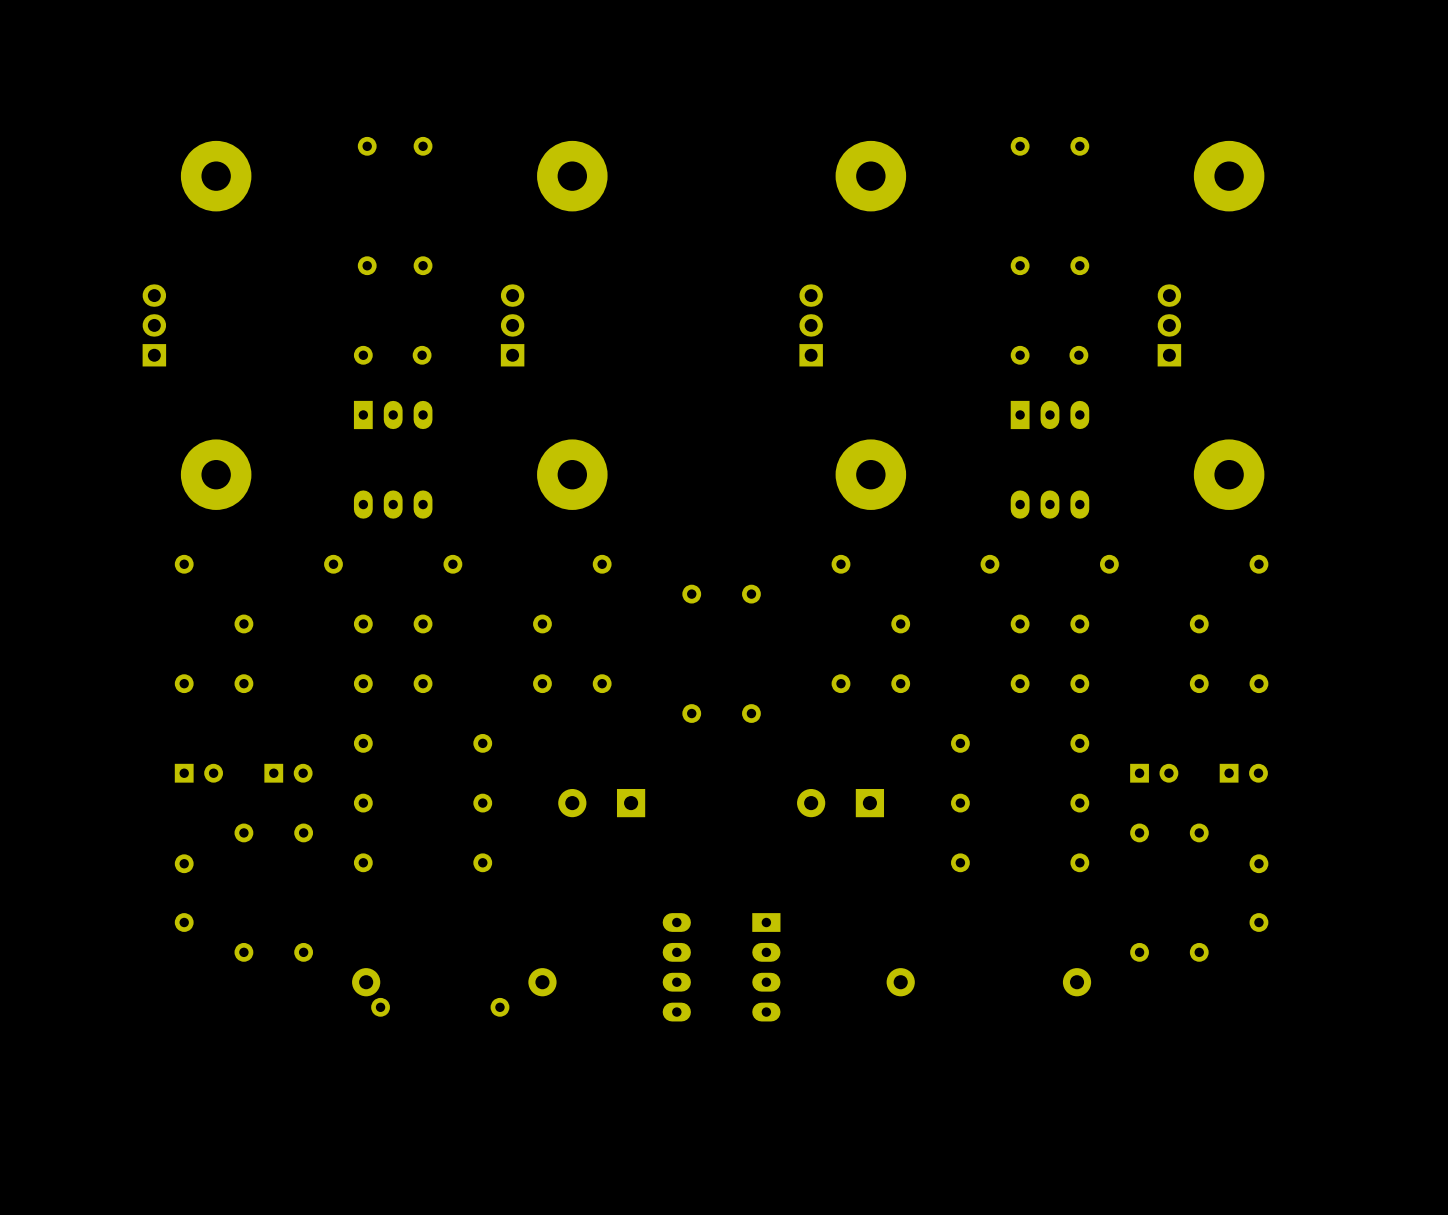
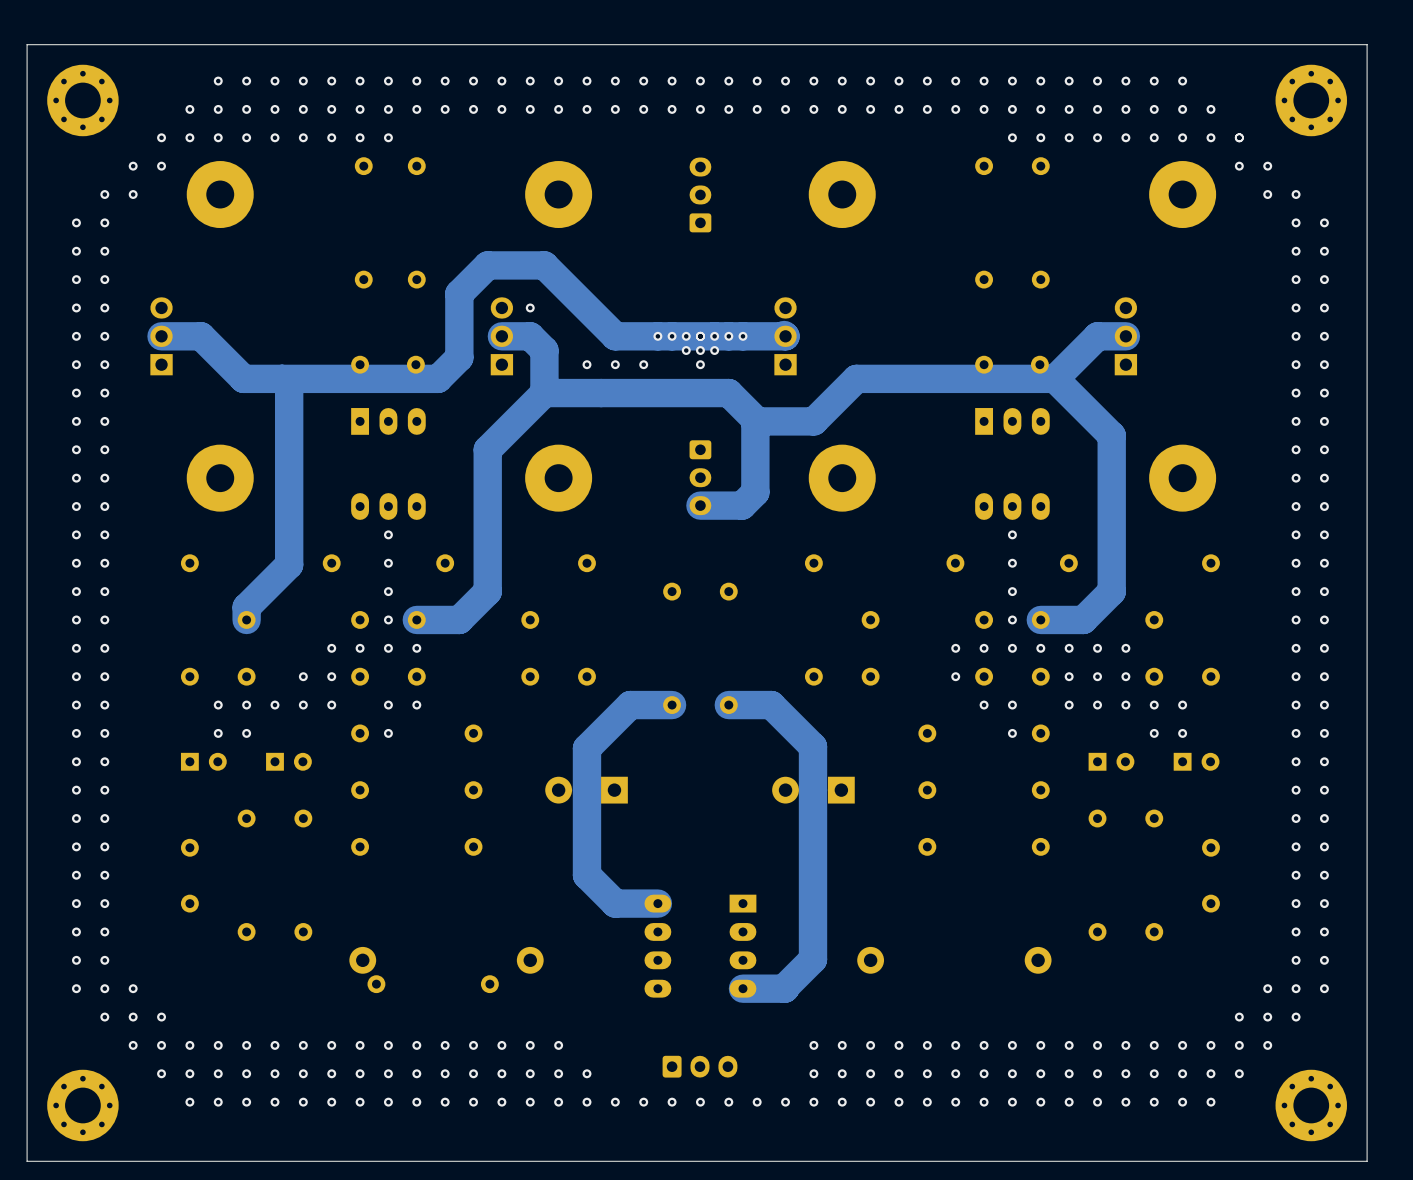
board edge: none -> (1367, 44) (1367, 1161) (27, 1161) (27, 44) (1367, 44)
via: none -> (218, 81)
via: none -> (246, 81)
via: none -> (274, 81)
via: none -> (303, 81)
via: none -> (331, 81)
via: none -> (360, 81)
via: none -> (388, 81)
via: none -> (416, 81)
via: none -> (445, 81)
via: none -> (473, 81)
via: none -> (501, 81)
via: none -> (530, 81)
via: none -> (558, 81)
via: none -> (586, 81)
via: none -> (615, 81)
via: none -> (643, 81)
via: none -> (672, 81)
via: none -> (700, 81)
via: none -> (728, 81)
via: none -> (757, 81)
via: none -> (785, 81)
via: none -> (813, 81)
via: none -> (842, 81)
via: none -> (870, 81)
via: none -> (898, 81)
via: none -> (927, 81)
via: none -> (955, 81)
via: none -> (984, 81)
via: none -> (1012, 81)
via: none -> (1040, 81)
via: none -> (1069, 81)
via: none -> (1097, 81)
via: none -> (1125, 81)
via: none -> (1154, 81)
via: none -> (1182, 81)
part: none -> (82, 100)
part: none -> (1311, 100)
via: none -> (189, 109)
via: none -> (218, 109)
via: none -> (246, 109)
via: none -> (274, 109)
via: none -> (303, 109)
via: none -> (331, 109)
via: none -> (360, 109)
via: none -> (388, 109)
via: none -> (416, 109)
via: none -> (445, 109)
via: none -> (473, 109)
via: none -> (501, 109)
via: none -> (530, 109)
via: none -> (558, 109)
via: none -> (586, 109)
via: none -> (615, 109)
via: none -> (643, 109)
via: none -> (672, 109)
via: none -> (700, 109)
via: none -> (728, 109)
via: none -> (757, 109)
via: none -> (785, 109)
via: none -> (813, 109)
via: none -> (842, 109)
via: none -> (870, 109)
via: none -> (898, 109)
via: none -> (927, 109)
via: none -> (955, 109)
via: none -> (984, 109)
via: none -> (1012, 109)
via: none -> (1040, 109)
via: none -> (1069, 109)
via: none -> (1097, 109)
via: none -> (1125, 109)
via: none -> (1154, 109)
via: none -> (1182, 109)
via: none -> (1210, 109)
via: none -> (161, 137)
via: none -> (189, 137)
via: none -> (218, 137)
via: none -> (246, 137)
via: none -> (274, 137)
via: none -> (303, 137)
via: none -> (331, 137)
via: none -> (360, 137)
via: none -> (388, 137)
via: none -> (1012, 137)
via: none -> (1040, 137)
via: none -> (1069, 137)
via: none -> (1097, 137)
via: none -> (1125, 137)
via: none -> (1154, 137)
via: none -> (1182, 137)
via: none -> (1210, 137)
via: none -> (1239, 137)
via: none -> (133, 166)
via: none -> (161, 166)
via: none -> (1239, 166)
via: none -> (1267, 166)
via: none -> (104, 194)
via: none -> (133, 194)
part: none -> (700, 194)
via: none -> (1267, 194)
via: none -> (1296, 194)
via: none -> (76, 222)
via: none -> (104, 222)
via: none -> (1296, 222)
via: none -> (1324, 222)
via: none -> (76, 251)
via: none -> (104, 251)
via: none -> (1296, 251)
via: none -> (1324, 251)
via: none -> (76, 279)
via: none -> (104, 279)
via: none -> (1296, 279)
via: none -> (1324, 279)
via: none -> (76, 307)
via: none -> (104, 307)
via: none -> (530, 307)
via: none -> (1296, 307)
via: none -> (1324, 307)
track: none -> (784, 335) (785, 336) (615, 336) (544, 265) (487, 265) (459, 293) (459, 357) (438, 378) (243, 378) (201, 336) (161, 336)
via: none -> (76, 336)
via: none -> (104, 336)
track: none -> (501, 336) (530, 336) (544, 350) (544, 393)
via: none -> (657, 336)
via: none -> (672, 336)
via: none -> (686, 336)
via: none -> (700, 336)
via: none -> (714, 336)
via: none -> (728, 336)
via: none -> (742, 336)
track: none -> (1125, 336) (1097, 336) (1054, 378)
via: none -> (1296, 336)
via: none -> (1324, 336)
via: none -> (686, 350)
via: none -> (700, 350)
via: none -> (714, 350)
via: none -> (76, 364)
via: none -> (104, 364)
via: none -> (586, 364)
via: none -> (615, 364)
via: none -> (643, 364)
via: none -> (700, 364)
via: none -> (1296, 364)
via: none -> (1324, 364)
track: none -> (282, 378) (289, 385) (289, 564) (246, 607) (246, 619)
track: none -> (1054, 378) (856, 378) (813, 421) (757, 421)
track: none -> (1054, 378) (1111, 435) (1111, 591) (1083, 619) (1040, 619)
via: none -> (76, 393)
via: none -> (104, 393)
track: none -> (544, 393) (728, 393) (757, 421)
track: none -> (544, 393) (487, 449) (487, 591) (459, 619) (416, 619)
via: none -> (1296, 393)
via: none -> (1324, 393)
via: none -> (76, 421)
via: none -> (104, 421)
track: none -> (757, 421) (755, 423) (755, 492) (742, 505) (700, 505)
via: none -> (1296, 421)
via: none -> (1324, 421)
via: none -> (76, 449)
via: none -> (104, 449)
via: none -> (1296, 449)
via: none -> (1324, 449)
via: none -> (76, 478)
via: none -> (104, 478)
part: none -> (700, 477)
via: none -> (1296, 478)
via: none -> (1324, 478)
via: none -> (76, 506)
via: none -> (104, 506)
via: none -> (1296, 506)
via: none -> (1324, 506)
via: none -> (76, 534)
via: none -> (104, 534)
via: none -> (388, 534)
via: none -> (1012, 534)
via: none -> (1296, 534)
via: none -> (1324, 534)
via: none -> (76, 563)
via: none -> (104, 563)
via: none -> (388, 563)
via: none -> (1012, 563)
via: none -> (1296, 563)
via: none -> (1324, 563)
via: none -> (76, 591)
via: none -> (104, 591)
via: none -> (388, 591)
via: none -> (1012, 591)
via: none -> (1296, 591)
via: none -> (1324, 591)
via: none -> (76, 619)
via: none -> (104, 619)
via: none -> (388, 619)
via: none -> (1012, 619)
via: none -> (1296, 619)
via: none -> (1324, 619)
via: none -> (76, 648)
via: none -> (104, 648)
via: none -> (331, 648)
via: none -> (360, 648)
via: none -> (388, 648)
via: none -> (416, 648)
via: none -> (955, 648)
via: none -> (984, 648)
via: none -> (1012, 648)
via: none -> (1040, 648)
via: none -> (1069, 648)
via: none -> (1097, 648)
via: none -> (1125, 648)
via: none -> (1296, 648)
via: none -> (1324, 648)
via: none -> (76, 676)
via: none -> (104, 676)
via: none -> (303, 676)
via: none -> (331, 676)
via: none -> (955, 676)
via: none -> (1069, 676)
via: none -> (1097, 676)
via: none -> (1125, 676)
via: none -> (1296, 676)
via: none -> (1324, 676)
via: none -> (76, 705)
via: none -> (104, 705)
via: none -> (218, 705)
via: none -> (246, 705)
via: none -> (274, 705)
via: none -> (303, 705)
via: none -> (331, 705)
via: none -> (388, 705)
via: none -> (416, 705)
track: none -> (672, 705) (630, 705) (586, 748) (586, 875) (615, 903) (657, 903)
track: none -> (728, 705) (771, 705) (813, 746) (813, 959) (784, 988) (742, 988)
via: none -> (984, 705)
via: none -> (1012, 705)
via: none -> (1069, 705)
via: none -> (1097, 705)
via: none -> (1125, 705)
via: none -> (1154, 705)
via: none -> (1182, 705)
via: none -> (1296, 705)
via: none -> (1324, 705)
via: none -> (76, 733)
via: none -> (104, 733)
via: none -> (218, 733)
via: none -> (246, 733)
via: none -> (388, 733)
via: none -> (1012, 733)
via: none -> (1154, 733)
via: none -> (1182, 733)
via: none -> (1296, 733)
via: none -> (1324, 733)
via: none -> (76, 761)
via: none -> (104, 761)
via: none -> (1296, 761)
via: none -> (1324, 761)
via: none -> (76, 790)
via: none -> (104, 790)
via: none -> (1296, 790)
via: none -> (1324, 790)
via: none -> (76, 818)
via: none -> (104, 818)
via: none -> (1296, 818)
via: none -> (1324, 818)
via: none -> (76, 846)
via: none -> (104, 846)
via: none -> (1296, 846)
via: none -> (1324, 846)
via: none -> (76, 875)
via: none -> (104, 875)
via: none -> (1296, 875)
via: none -> (1324, 875)
via: none -> (76, 903)
via: none -> (104, 903)
via: none -> (1296, 903)
via: none -> (1324, 903)
via: none -> (76, 931)
via: none -> (104, 931)
via: none -> (1296, 931)
via: none -> (1324, 931)
via: none -> (76, 960)
via: none -> (104, 960)
via: none -> (1296, 960)
via: none -> (1324, 960)
via: none -> (76, 988)
via: none -> (104, 988)
via: none -> (133, 988)
via: none -> (1267, 988)
via: none -> (1296, 988)
via: none -> (1324, 988)
via: none -> (104, 1017)
via: none -> (133, 1017)
via: none -> (161, 1017)
via: none -> (1239, 1017)
via: none -> (1267, 1017)
via: none -> (1296, 1017)
via: none -> (133, 1045)
via: none -> (161, 1045)
via: none -> (189, 1045)
via: none -> (218, 1045)
via: none -> (246, 1045)
via: none -> (274, 1045)
via: none -> (303, 1045)
via: none -> (331, 1045)
via: none -> (360, 1045)
via: none -> (388, 1045)
via: none -> (416, 1045)
via: none -> (445, 1045)
via: none -> (473, 1045)
via: none -> (501, 1045)
via: none -> (530, 1045)
via: none -> (558, 1045)
via: none -> (813, 1045)
via: none -> (842, 1045)
via: none -> (870, 1045)
via: none -> (898, 1045)
via: none -> (927, 1045)
via: none -> (955, 1045)
via: none -> (984, 1045)
via: none -> (1012, 1045)
via: none -> (1040, 1045)
via: none -> (1069, 1045)
via: none -> (1097, 1045)
via: none -> (1125, 1045)
via: none -> (1154, 1045)
via: none -> (1182, 1045)
via: none -> (1210, 1045)
via: none -> (1239, 1045)
via: none -> (1267, 1045)
part: none -> (699, 1066)
via: none -> (161, 1073)
via: none -> (189, 1073)
via: none -> (218, 1073)
via: none -> (246, 1073)
via: none -> (274, 1073)
via: none -> (303, 1073)
via: none -> (331, 1073)
via: none -> (360, 1073)
via: none -> (388, 1073)
via: none -> (416, 1073)
via: none -> (445, 1073)
via: none -> (473, 1073)
via: none -> (501, 1073)
via: none -> (530, 1073)
via: none -> (558, 1073)
via: none -> (586, 1073)
via: none -> (813, 1073)
via: none -> (842, 1073)
via: none -> (870, 1073)
via: none -> (898, 1073)
via: none -> (927, 1073)
via: none -> (955, 1073)
via: none -> (984, 1073)
via: none -> (1012, 1073)
via: none -> (1040, 1073)
via: none -> (1069, 1073)
via: none -> (1097, 1073)
via: none -> (1125, 1073)
via: none -> (1154, 1073)
via: none -> (1182, 1073)
via: none -> (1210, 1073)
via: none -> (1239, 1073)
via: none -> (189, 1102)
via: none -> (218, 1102)
via: none -> (246, 1102)
via: none -> (274, 1102)
via: none -> (303, 1102)
via: none -> (331, 1102)
via: none -> (360, 1102)
via: none -> (388, 1102)
via: none -> (416, 1102)
via: none -> (445, 1102)
via: none -> (473, 1102)
via: none -> (501, 1102)
via: none -> (530, 1102)
via: none -> (558, 1102)
via: none -> (586, 1102)
via: none -> (615, 1102)
via: none -> (643, 1102)
via: none -> (672, 1102)
via: none -> (700, 1102)
via: none -> (728, 1102)
via: none -> (757, 1102)
via: none -> (785, 1102)
via: none -> (813, 1102)
via: none -> (842, 1102)
via: none -> (870, 1102)
via: none -> (898, 1102)
via: none -> (927, 1102)
via: none -> (955, 1102)
via: none -> (984, 1102)
via: none -> (1012, 1102)
via: none -> (1040, 1102)
via: none -> (1069, 1102)
via: none -> (1097, 1102)
via: none -> (1125, 1102)
via: none -> (1154, 1102)
via: none -> (1182, 1102)
via: none -> (1210, 1102)
part: none -> (82, 1105)
part: none -> (1311, 1105)

